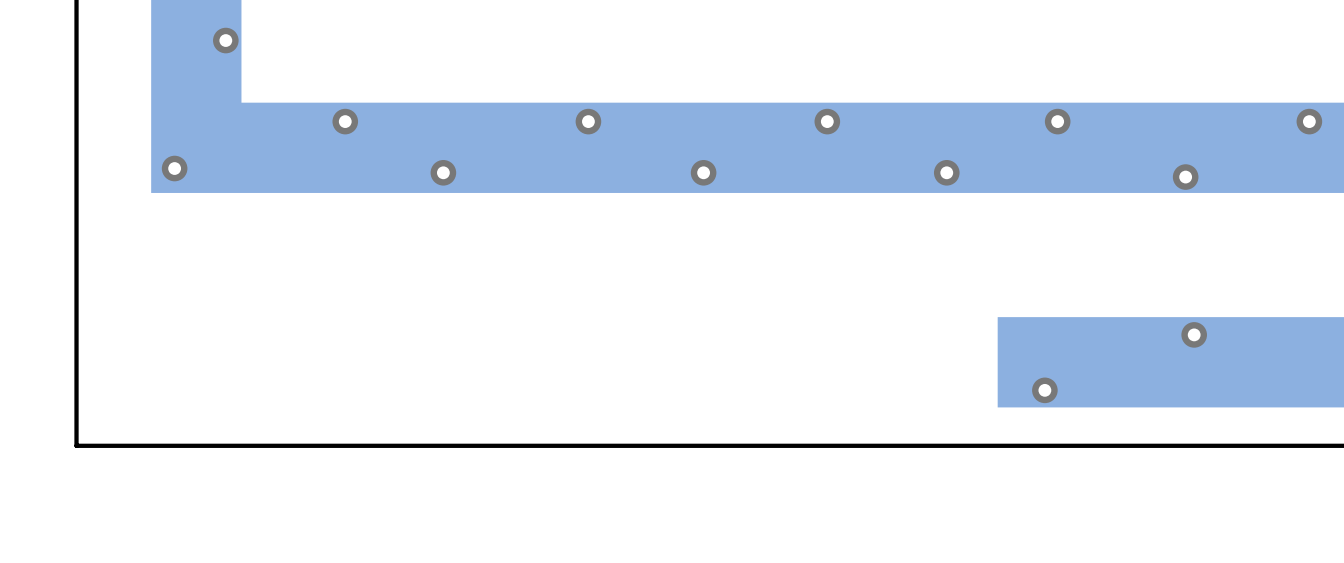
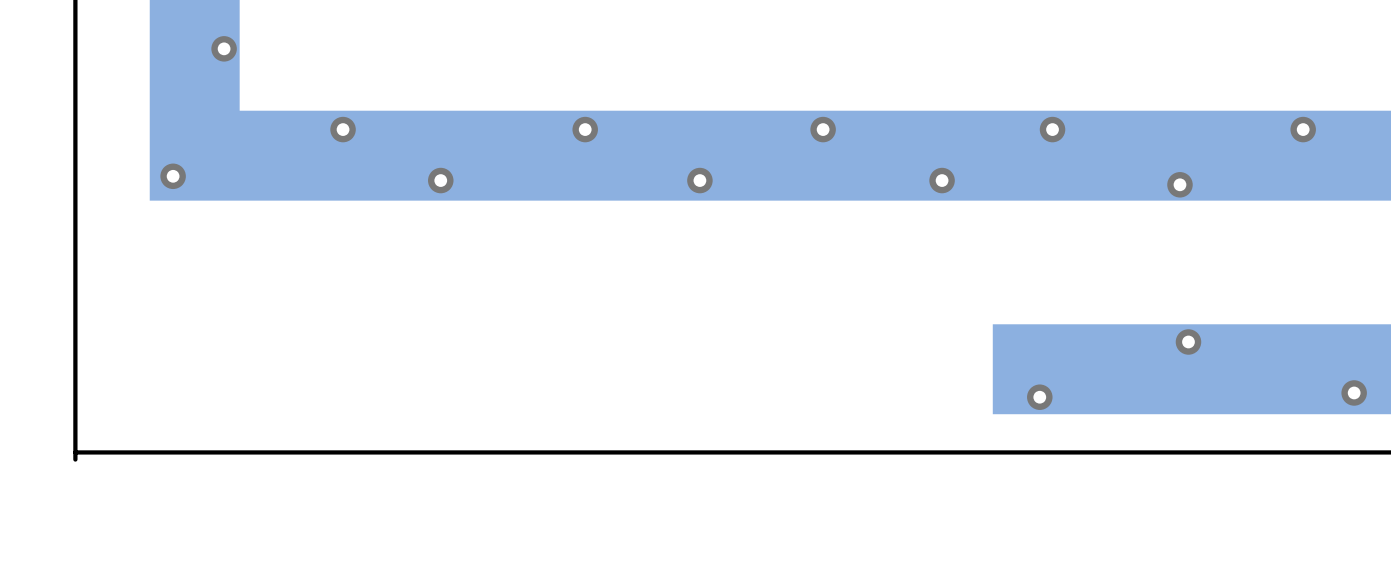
board edge: none -> (75, 452) (75, 459)

